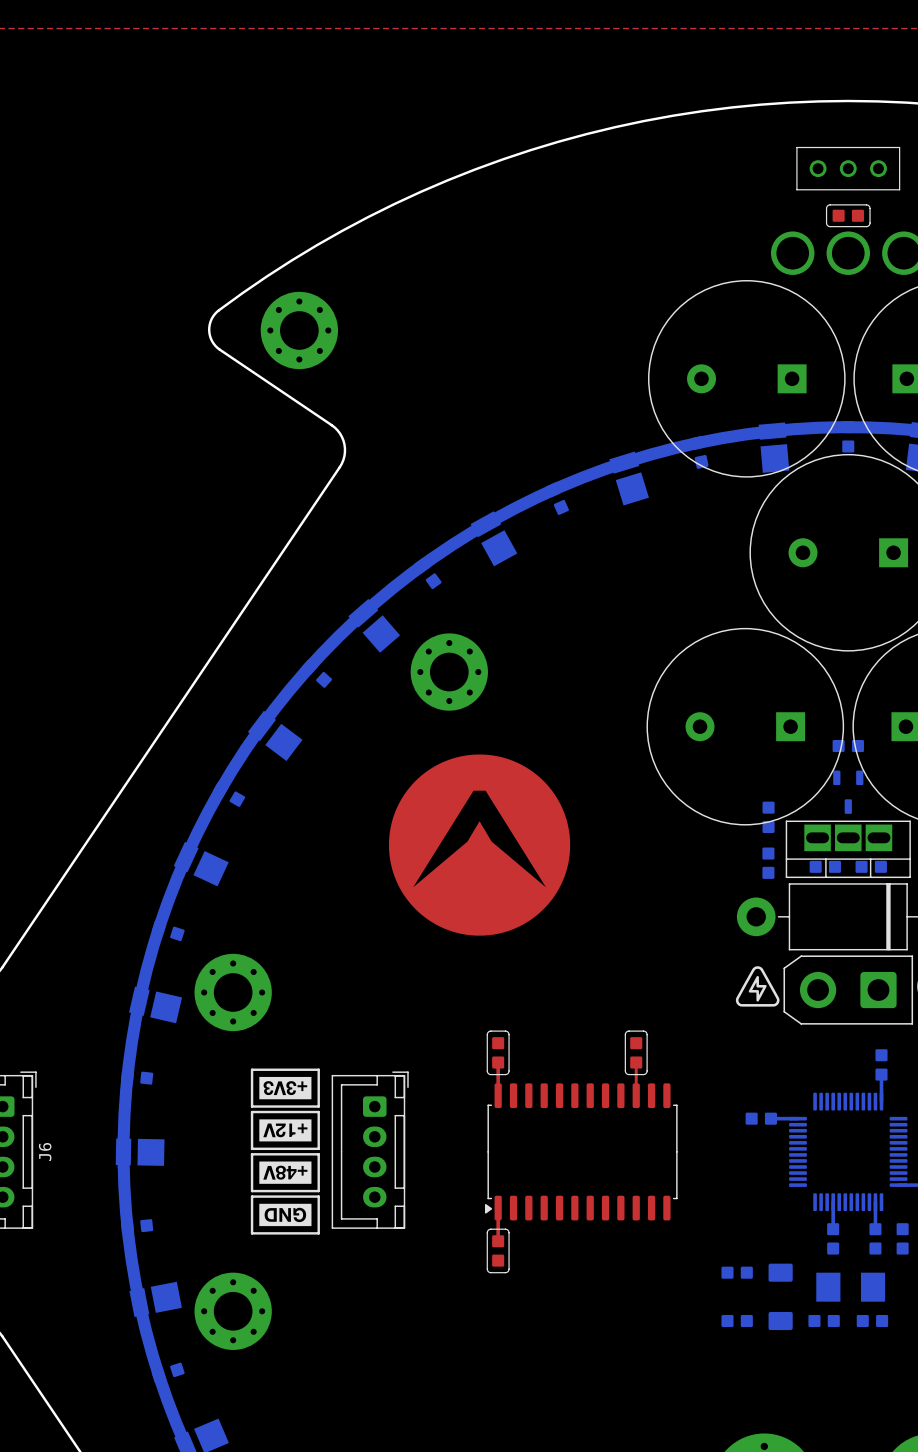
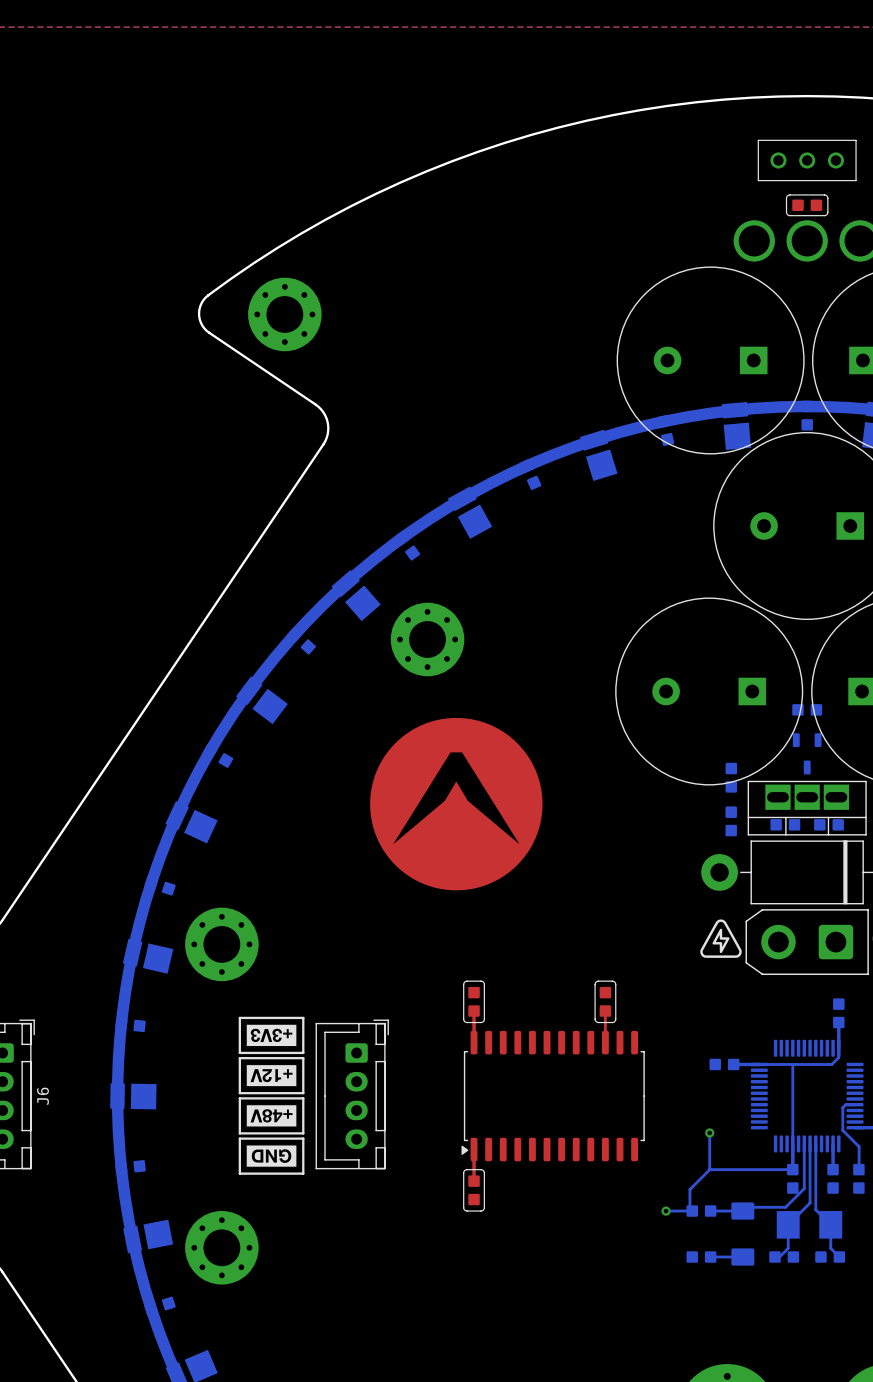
bottom track: none -> (838, 1048) (838, 1057) (831, 1064) (733, 1064)
bottom track: none -> (792, 1064) (792, 1165)
bottom track: none -> (855, 1104) (845, 1104) (842, 1107) (842, 1130) (859, 1146) (859, 1169)
bottom track: none -> (709, 1132) (709, 1169)
via: none -> (709, 1132)
bottom track: none -> (804, 1143) (804, 1188) (785, 1207) (746, 1207)
bottom track: none -> (810, 1143) (810, 1202) (788, 1224) (788, 1248) (777, 1259)
bottom track: none -> (815, 1143) (815, 1209) (830, 1224) (830, 1248) (841, 1259)
bottom track: none -> (788, 1169) (709, 1169) (689, 1189) (689, 1211) (666, 1211)
via: none -> (666, 1211)
bottom track: none -> (708, 1211) (742, 1211)
bottom track: none -> (708, 1257) (742, 1257)

